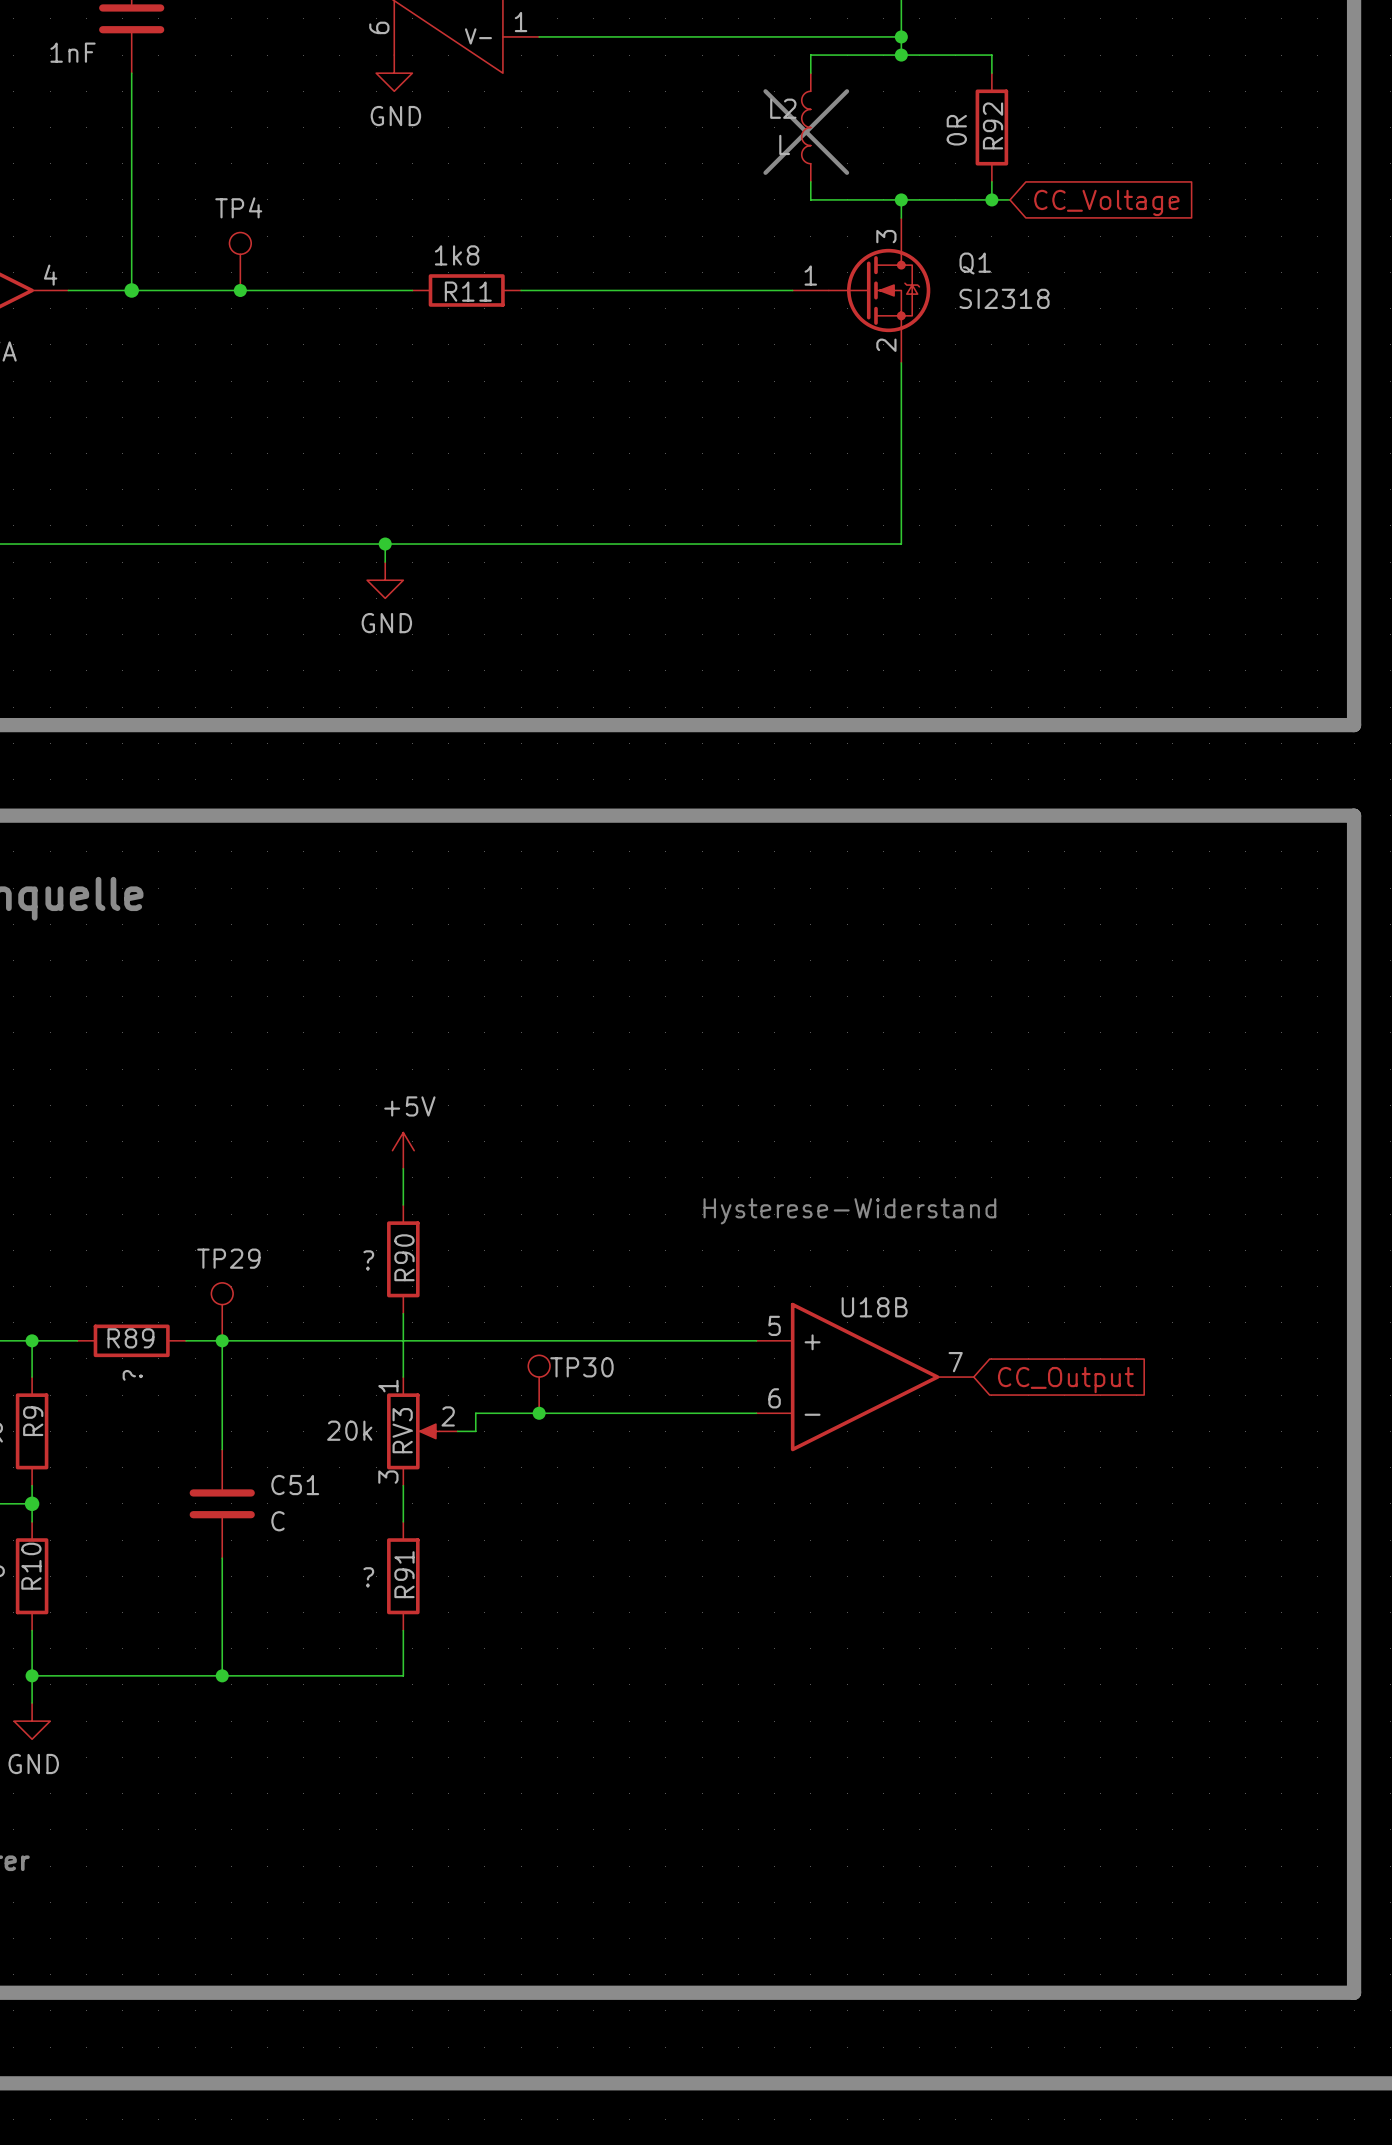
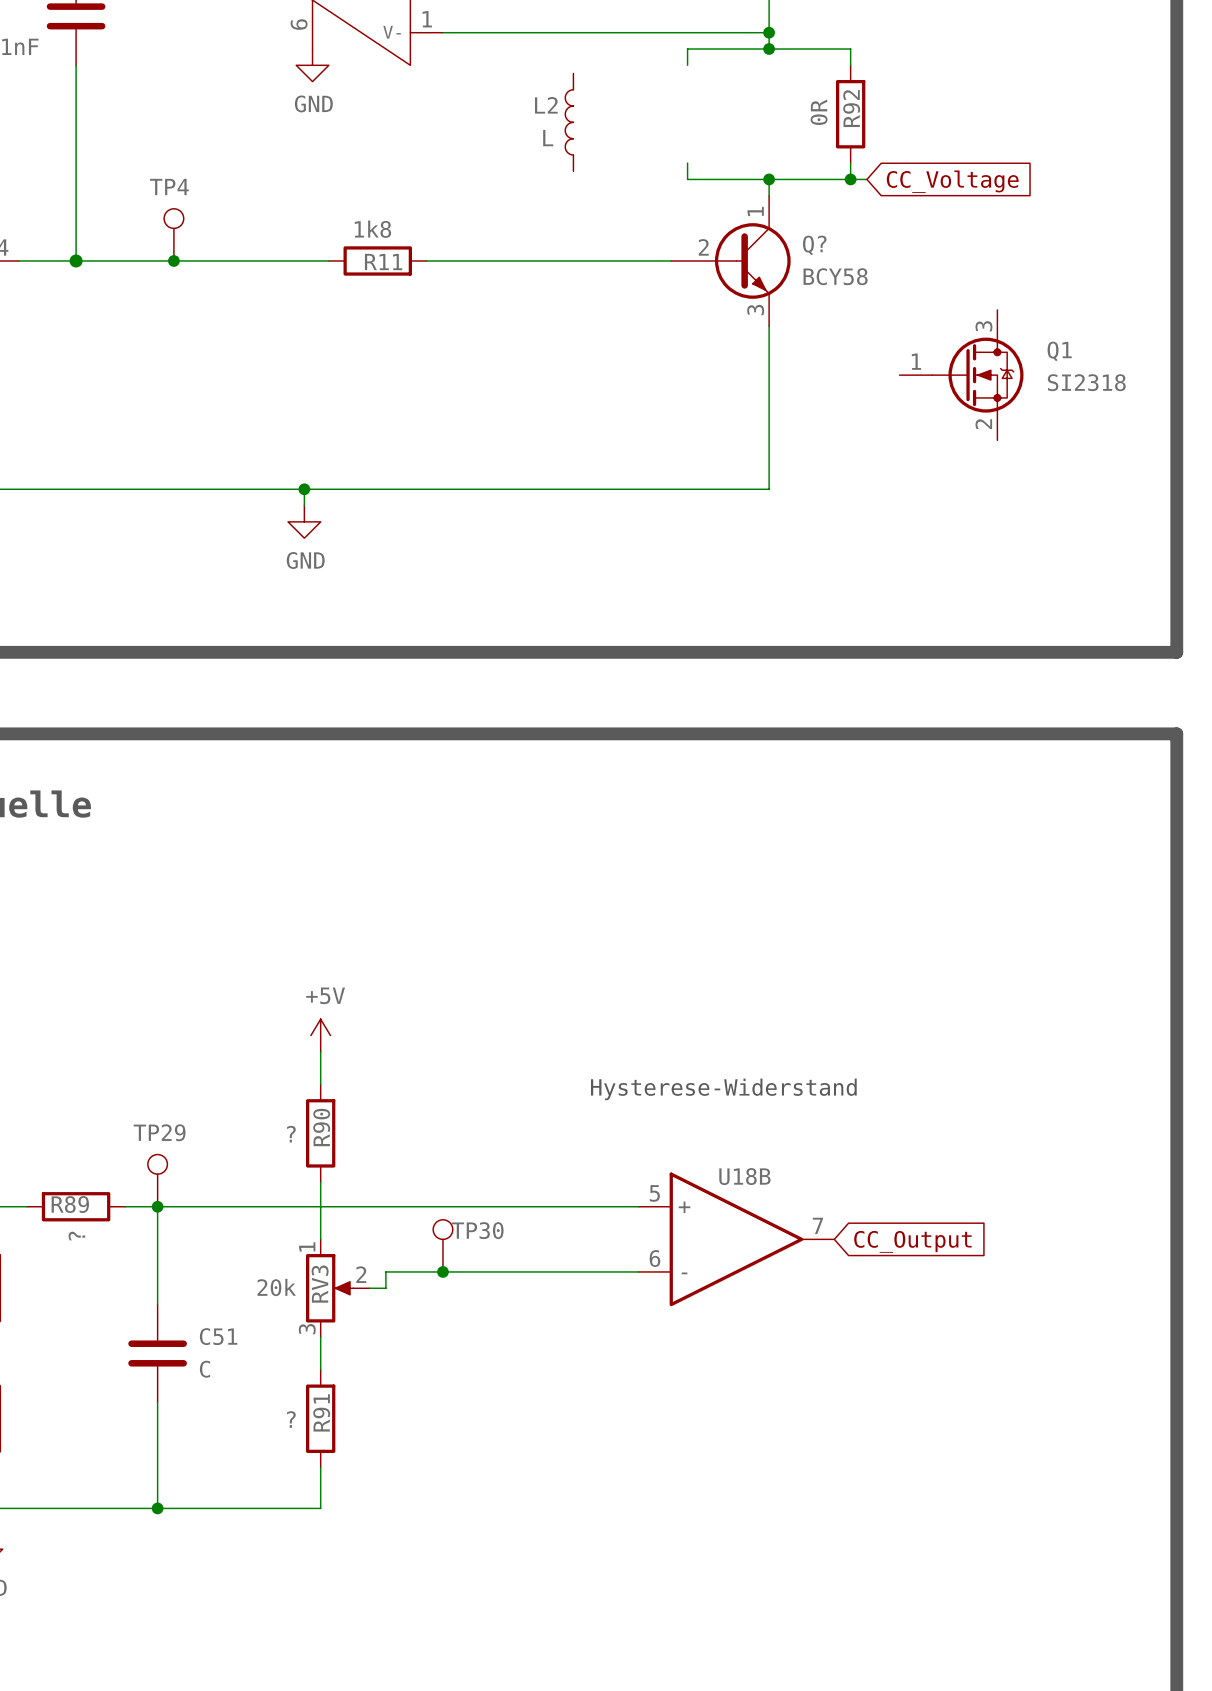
line: (765, 91) (847, 172) -> none
line: (847, 91) (765, 172) -> none
L2 position: (806, 127) -> (569, 122)
Q?: none -> BCY58 (730, 260)
Q1 position: (861, 290) -> (961, 375)

